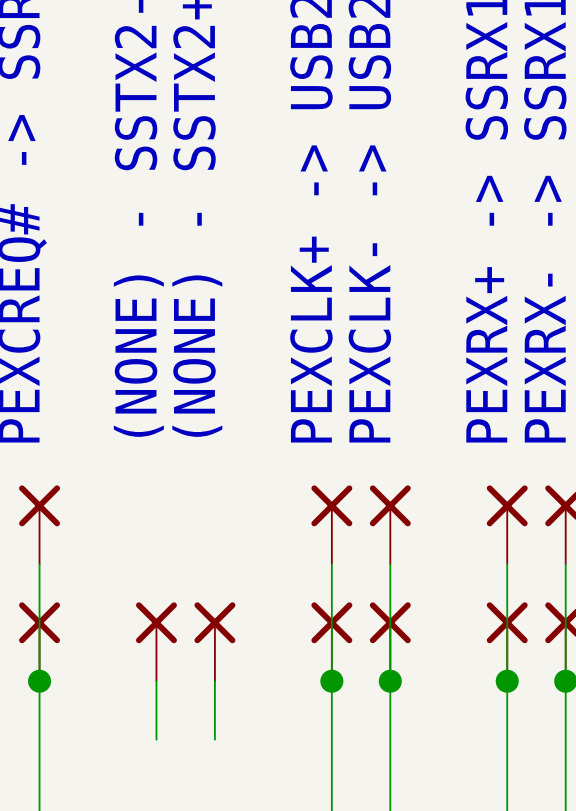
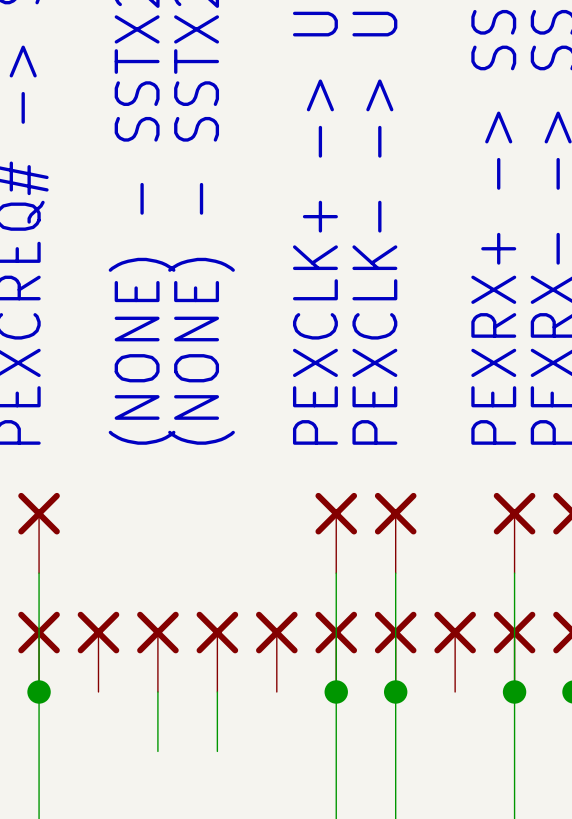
part: none -> (98, 651)
part: none -> (276, 651)
part: none -> (455, 651)

